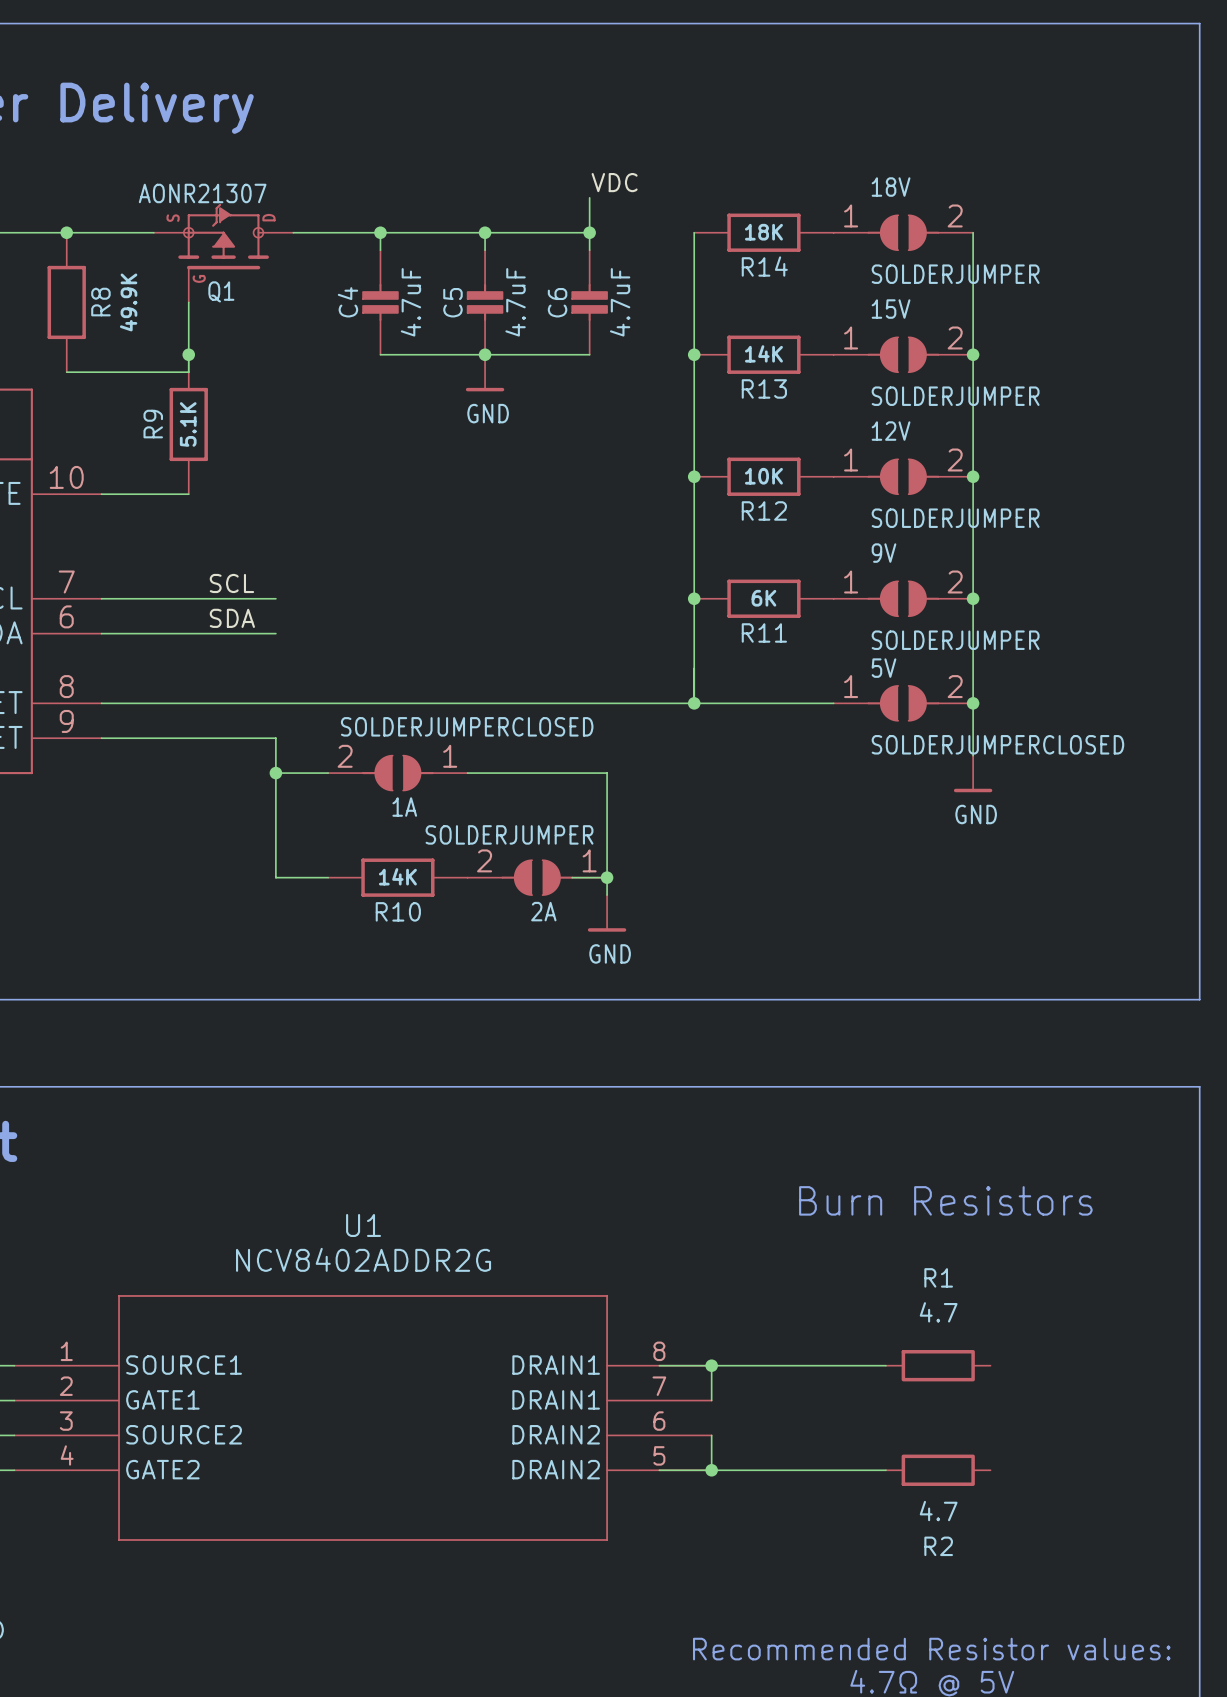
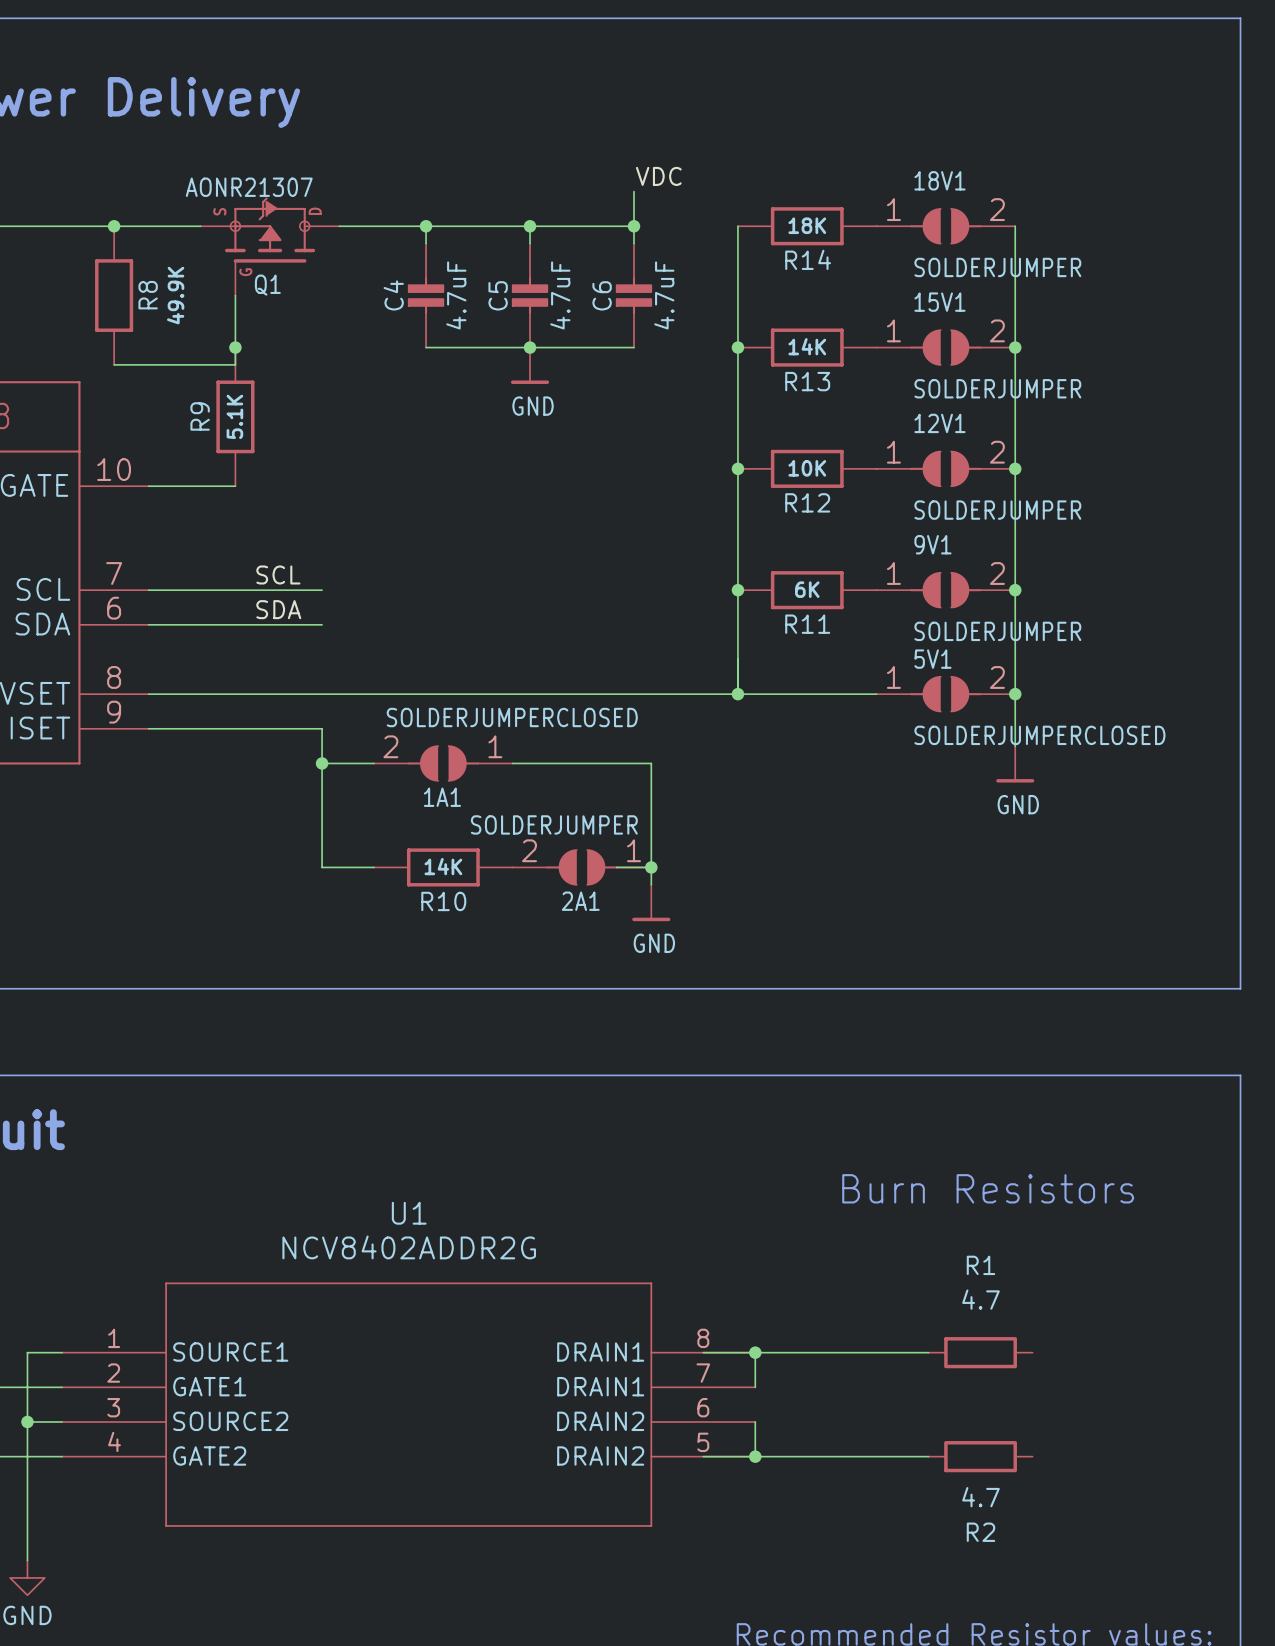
18V name: 18V (891, 187) -> 18V1 (939, 180)
15V name: 15V (891, 309) -> 15V1 (939, 302)
12V name: 12V (891, 431) -> 12V1 (939, 423)
9V name: 9V (884, 553) -> 9V1 (932, 544)
5V name: 5V (884, 668) -> 5V1 (932, 659)
1A name: 1A (404, 807) -> 1A1 (442, 797)
2A name: 2A (543, 911) -> 2A1 (580, 901)

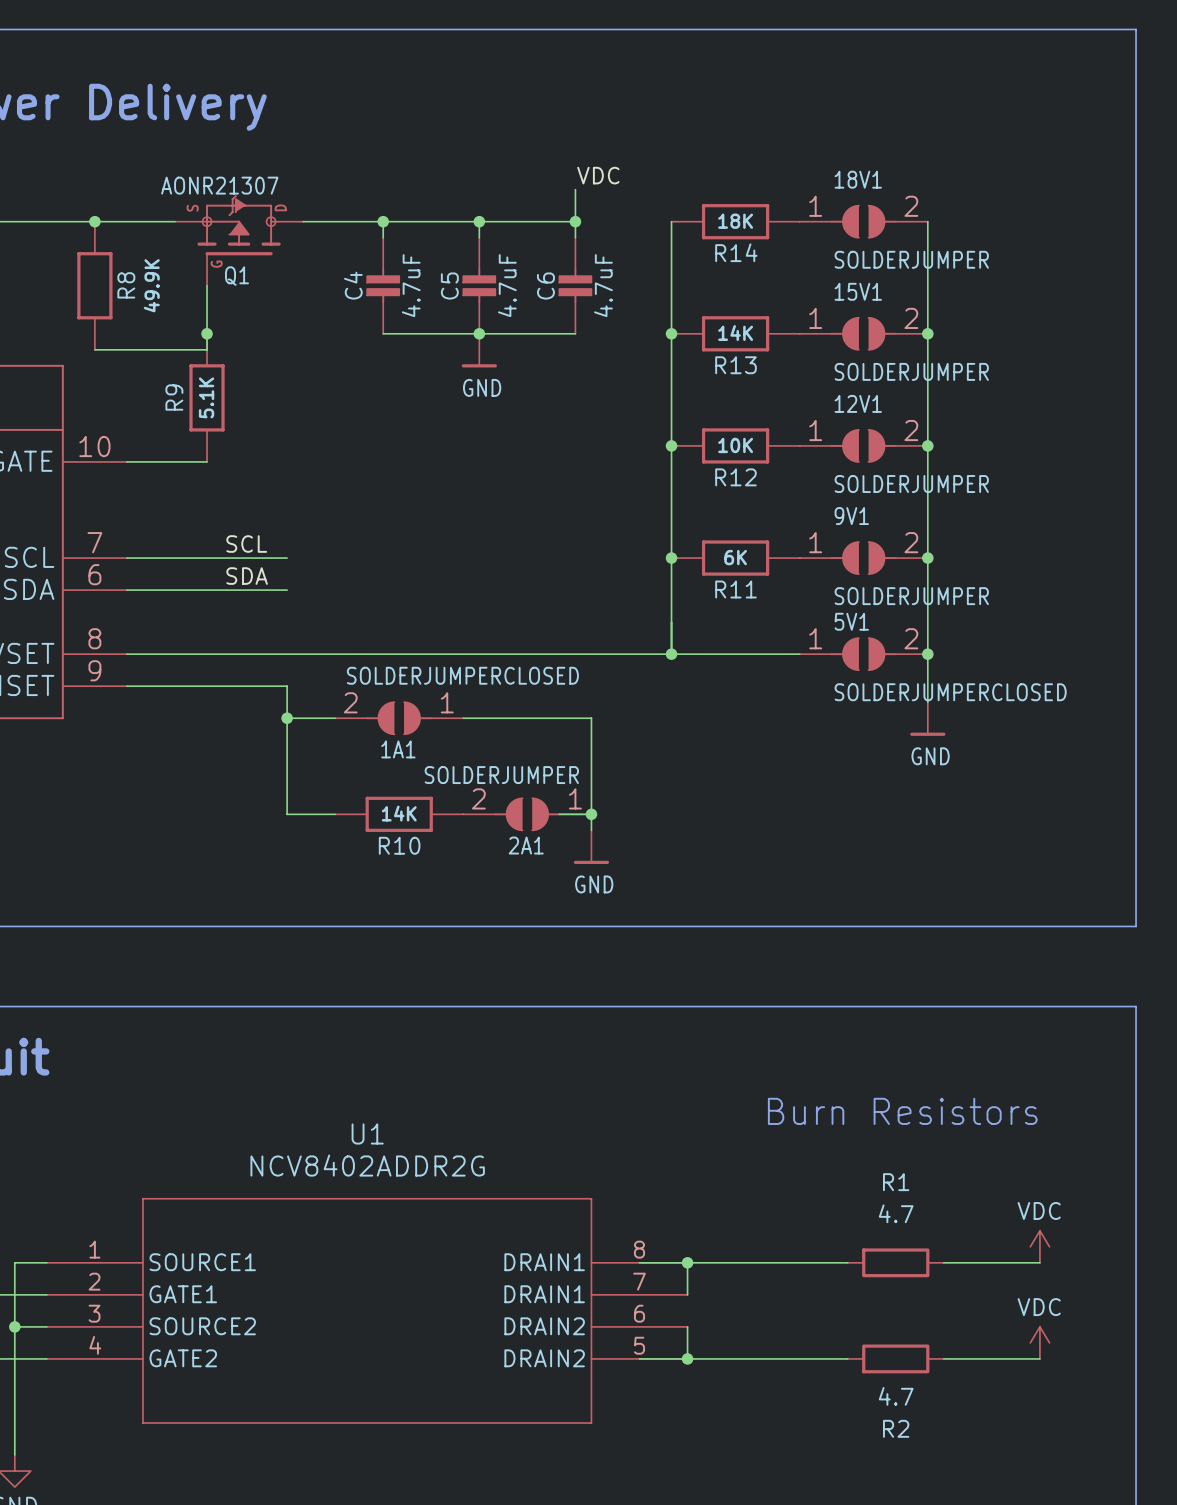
power symbol: none -> VDC (1039, 1246)
wire: none -> (943, 1262) (1039, 1262)
power symbol: none -> VDC (1039, 1342)
wire: none -> (943, 1358) (1039, 1358)

